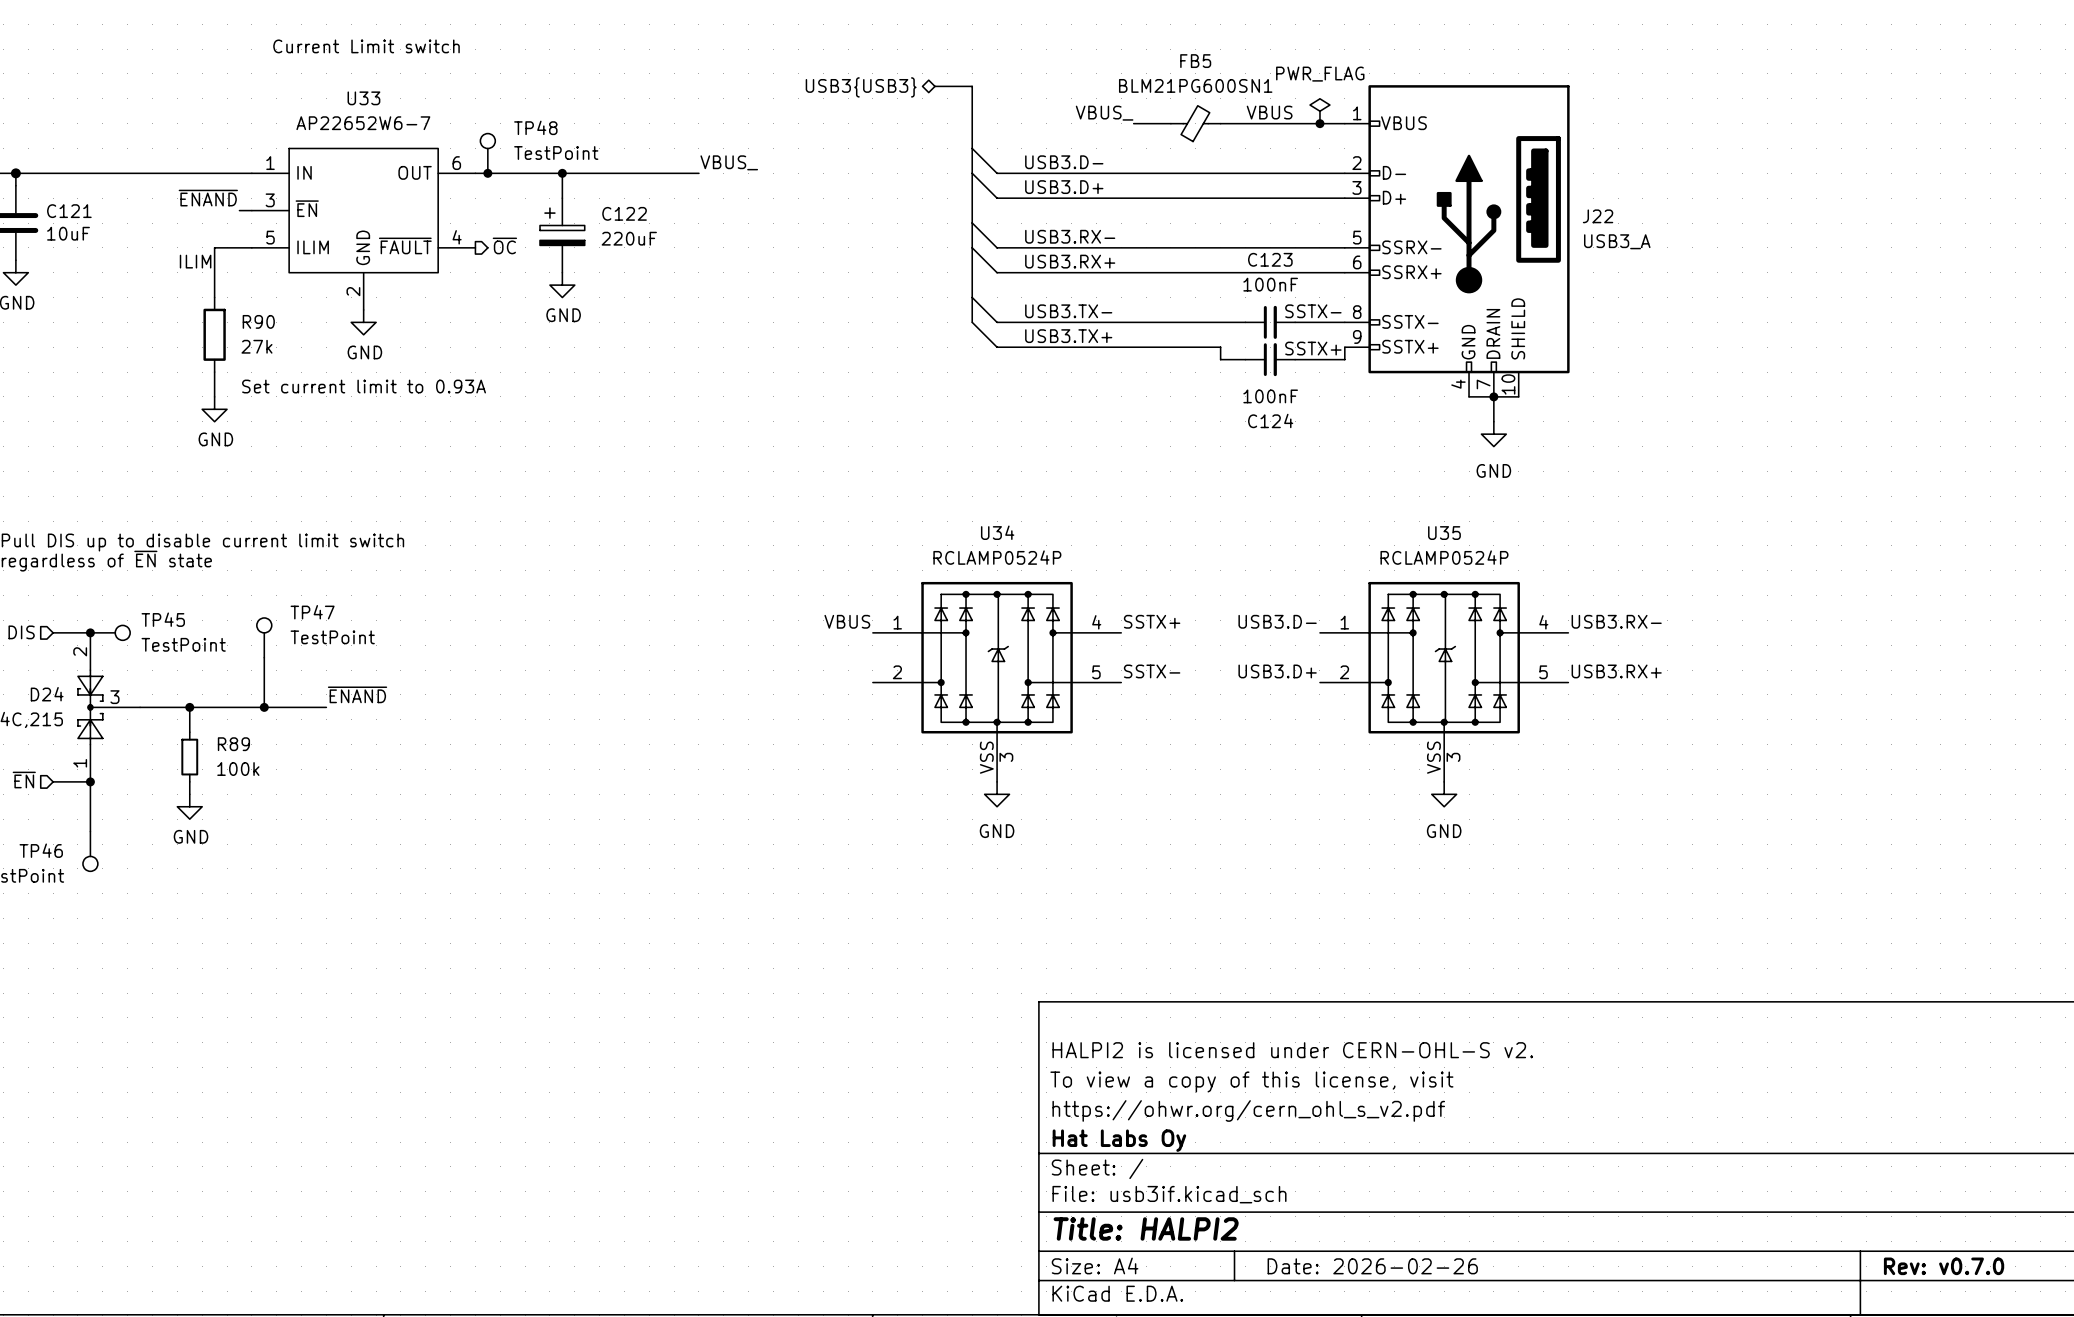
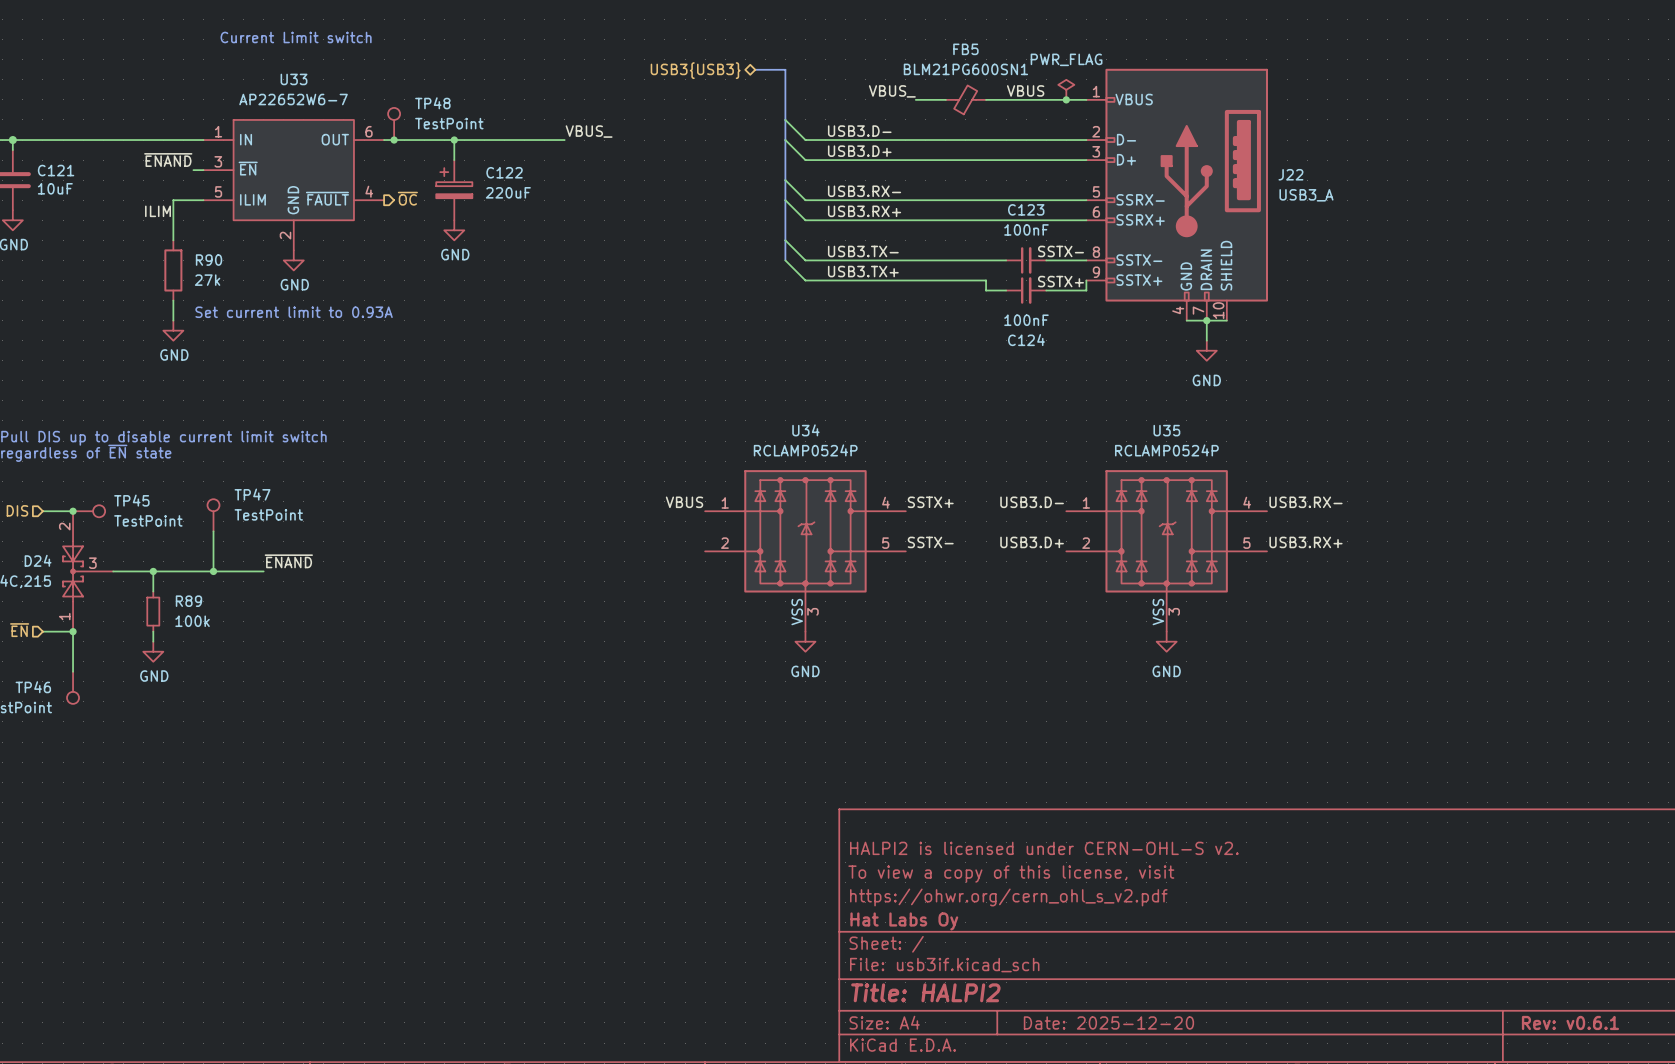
title block: Date: 2026-02-26 (1372, 1266) -> Date: 2025-12-20 (1108, 1022)
title block: Rev: v0.7.0 (1944, 1266) -> Rev: v0.6.1 (1570, 1022)

